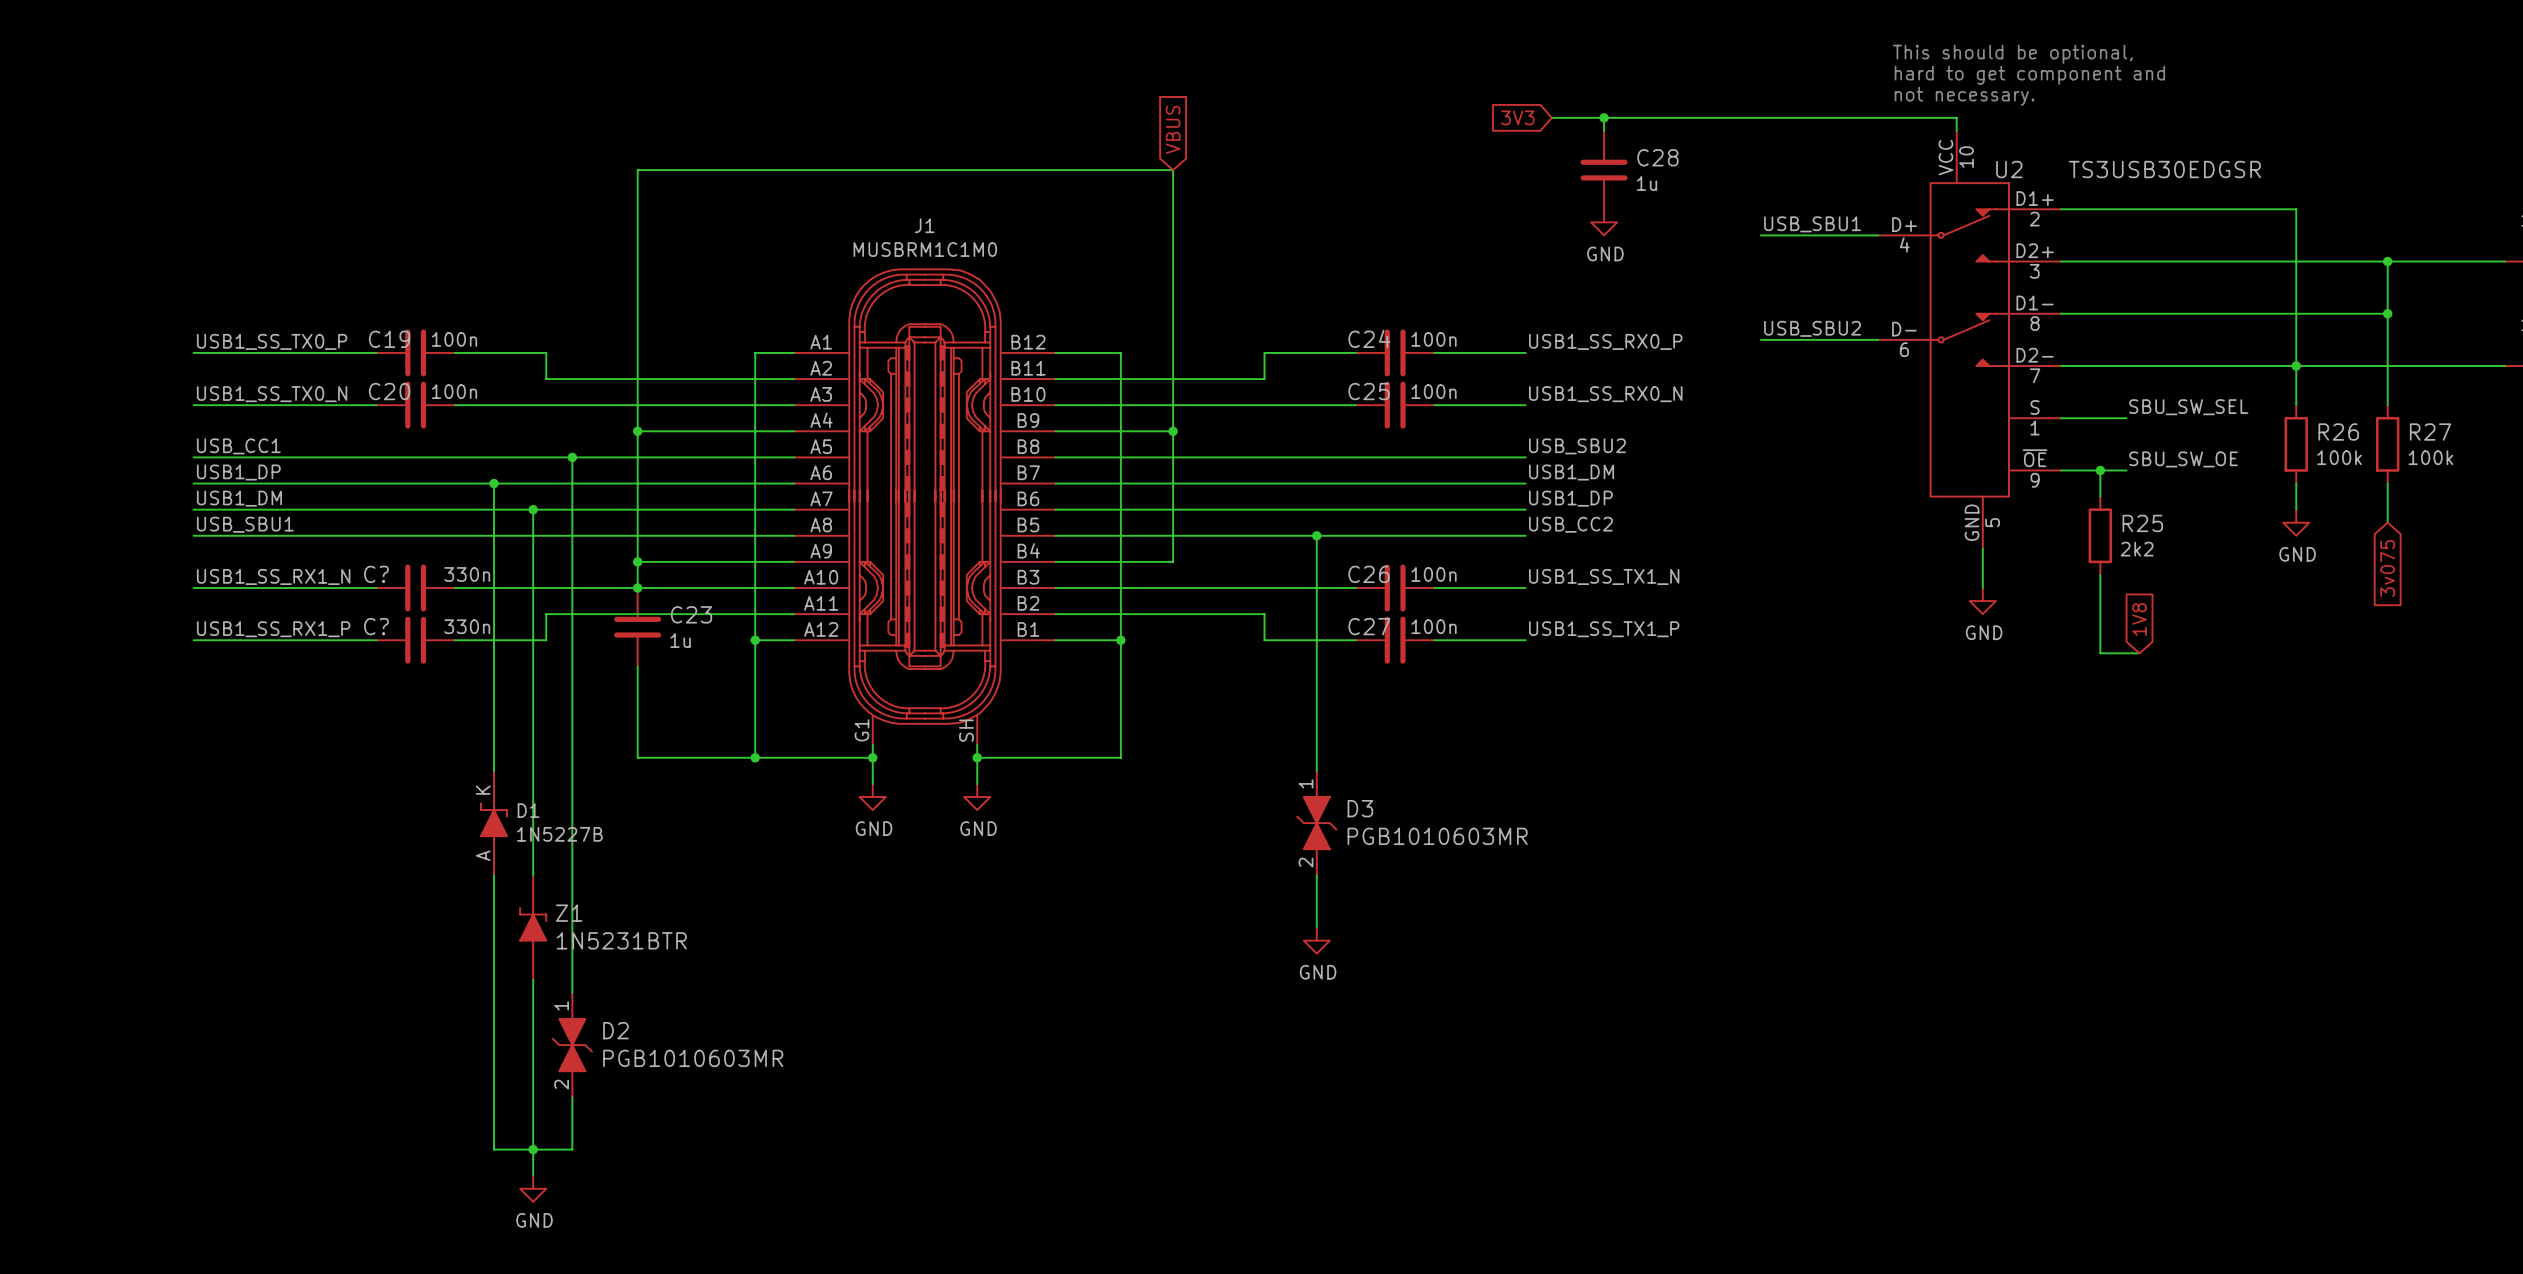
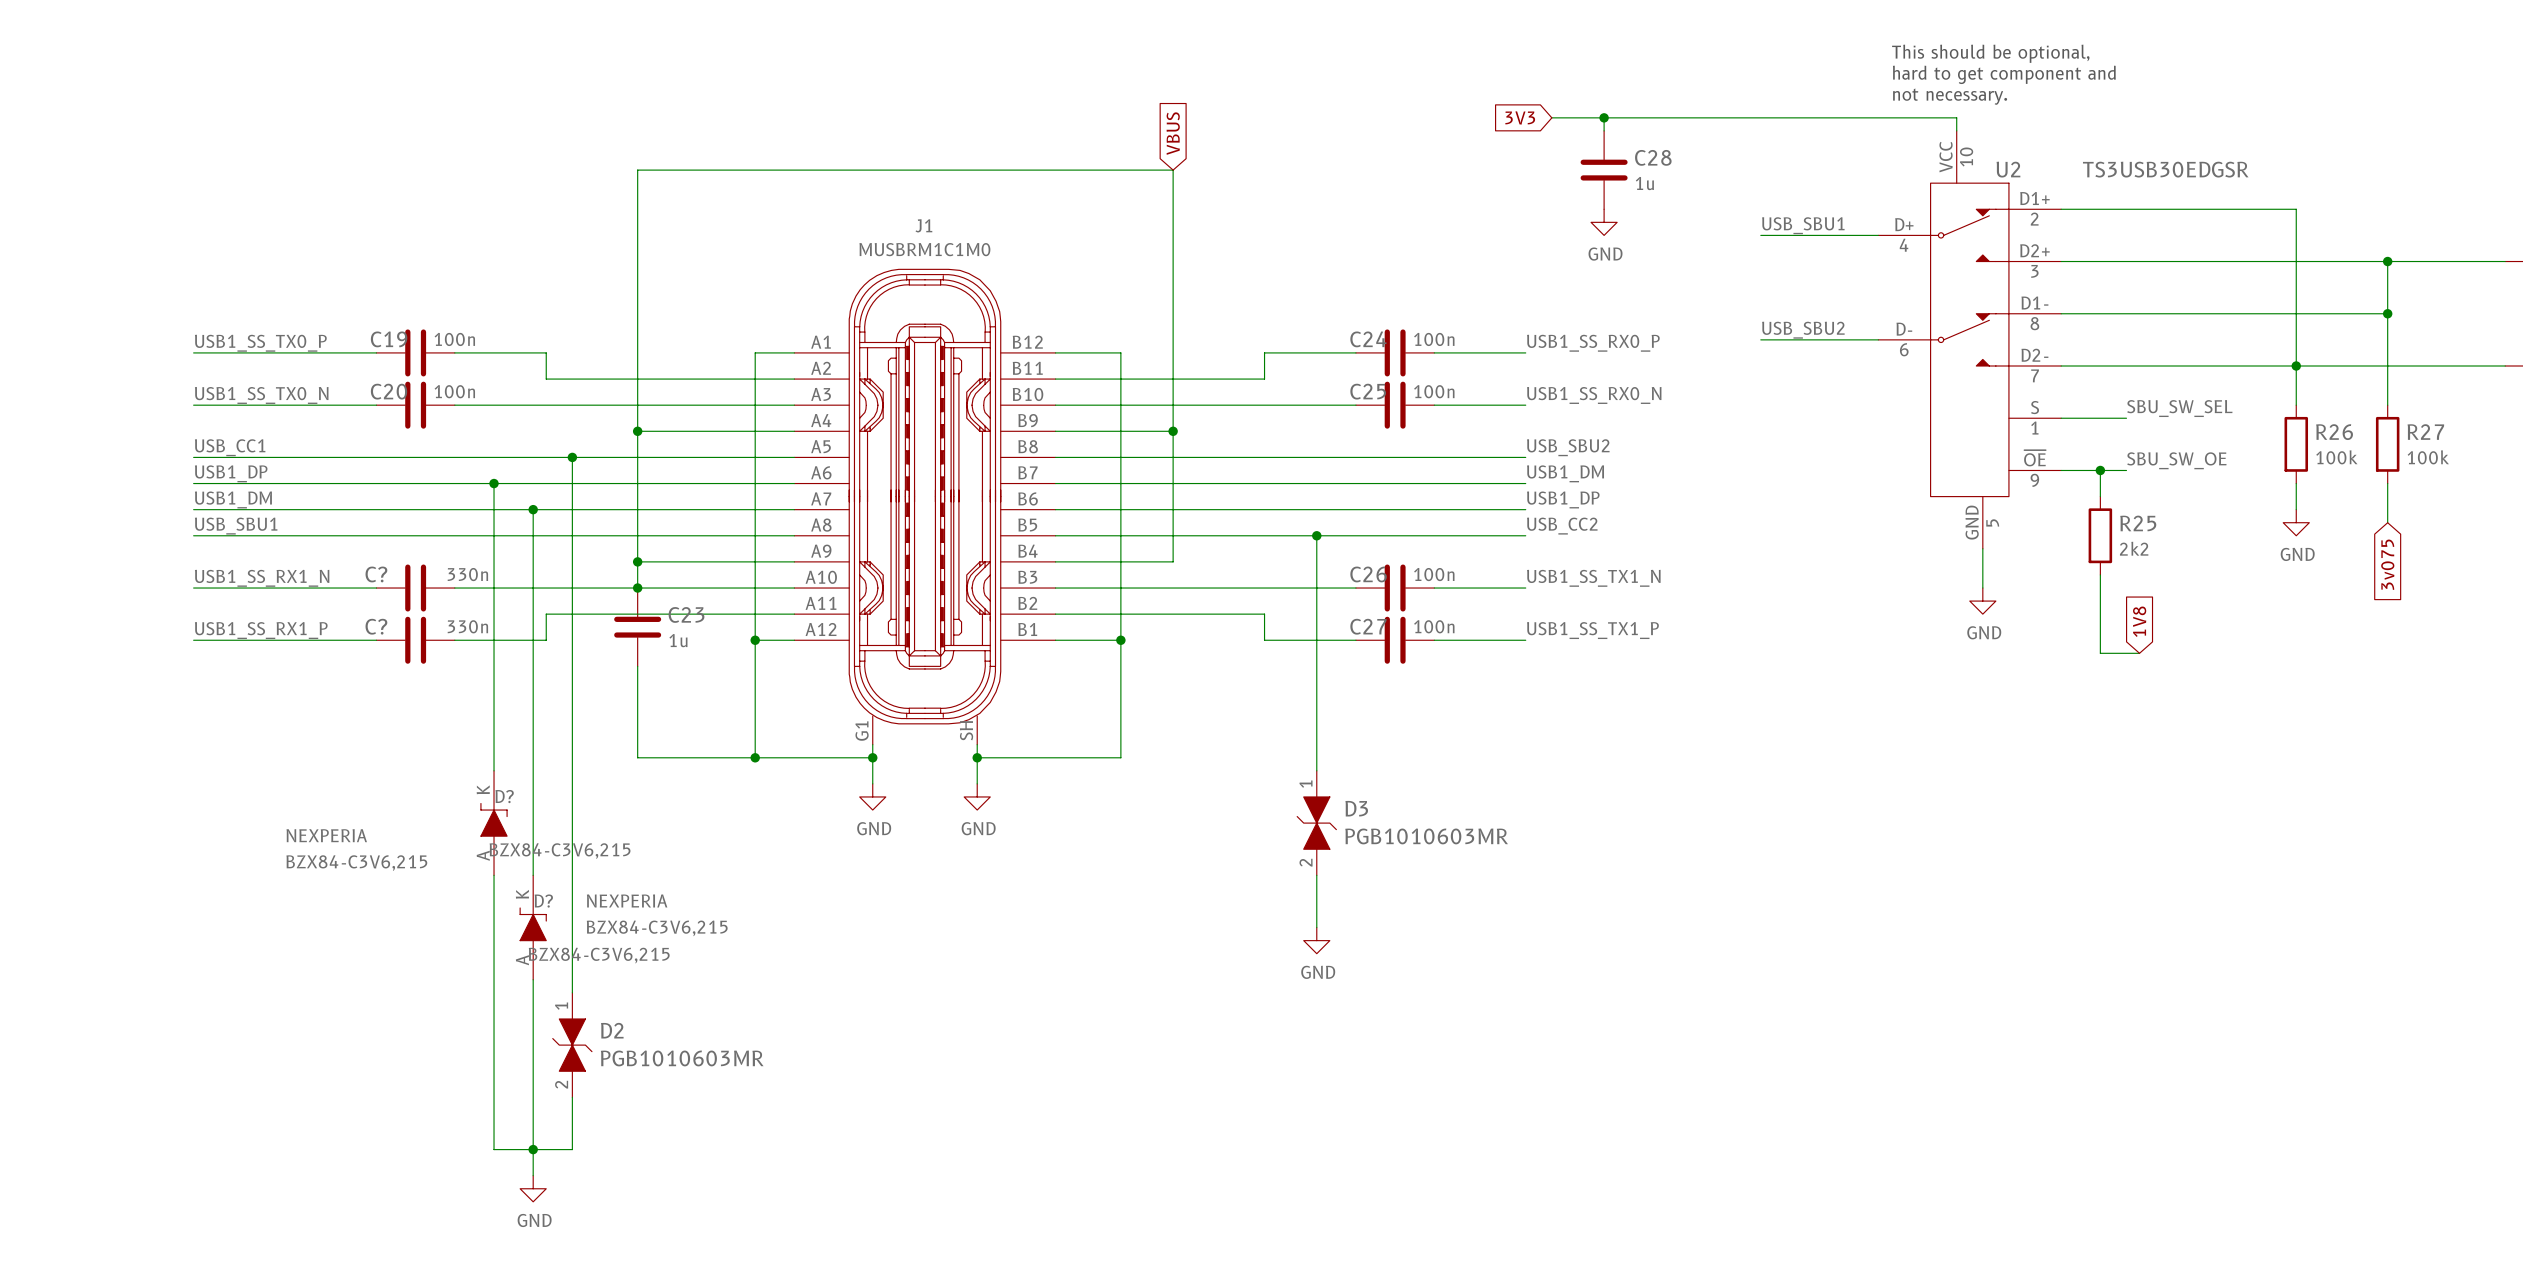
D1 name: D1 (528, 810) -> D? (504, 796)
D1 value: 1N5227B (559, 834) -> BZX84-C3V6,215 (560, 851)
D1 text: none -> NEXPERIA (326, 835)
D1 text: none -> BZX84-C3V6,215 (356, 863)
Z1 pin number: none -> K (522, 894)
Z1 text: none -> NEXPERIA (627, 900)
Z1 name: Z1 (569, 913) -> D? (543, 901)
Z1 text: none -> BZX84-C3V6,215 (657, 928)
Z1 value: 1N5231BTR (621, 940) -> BZX84-C3V6,215 (599, 955)
Z1 pin number: none -> A (522, 960)

